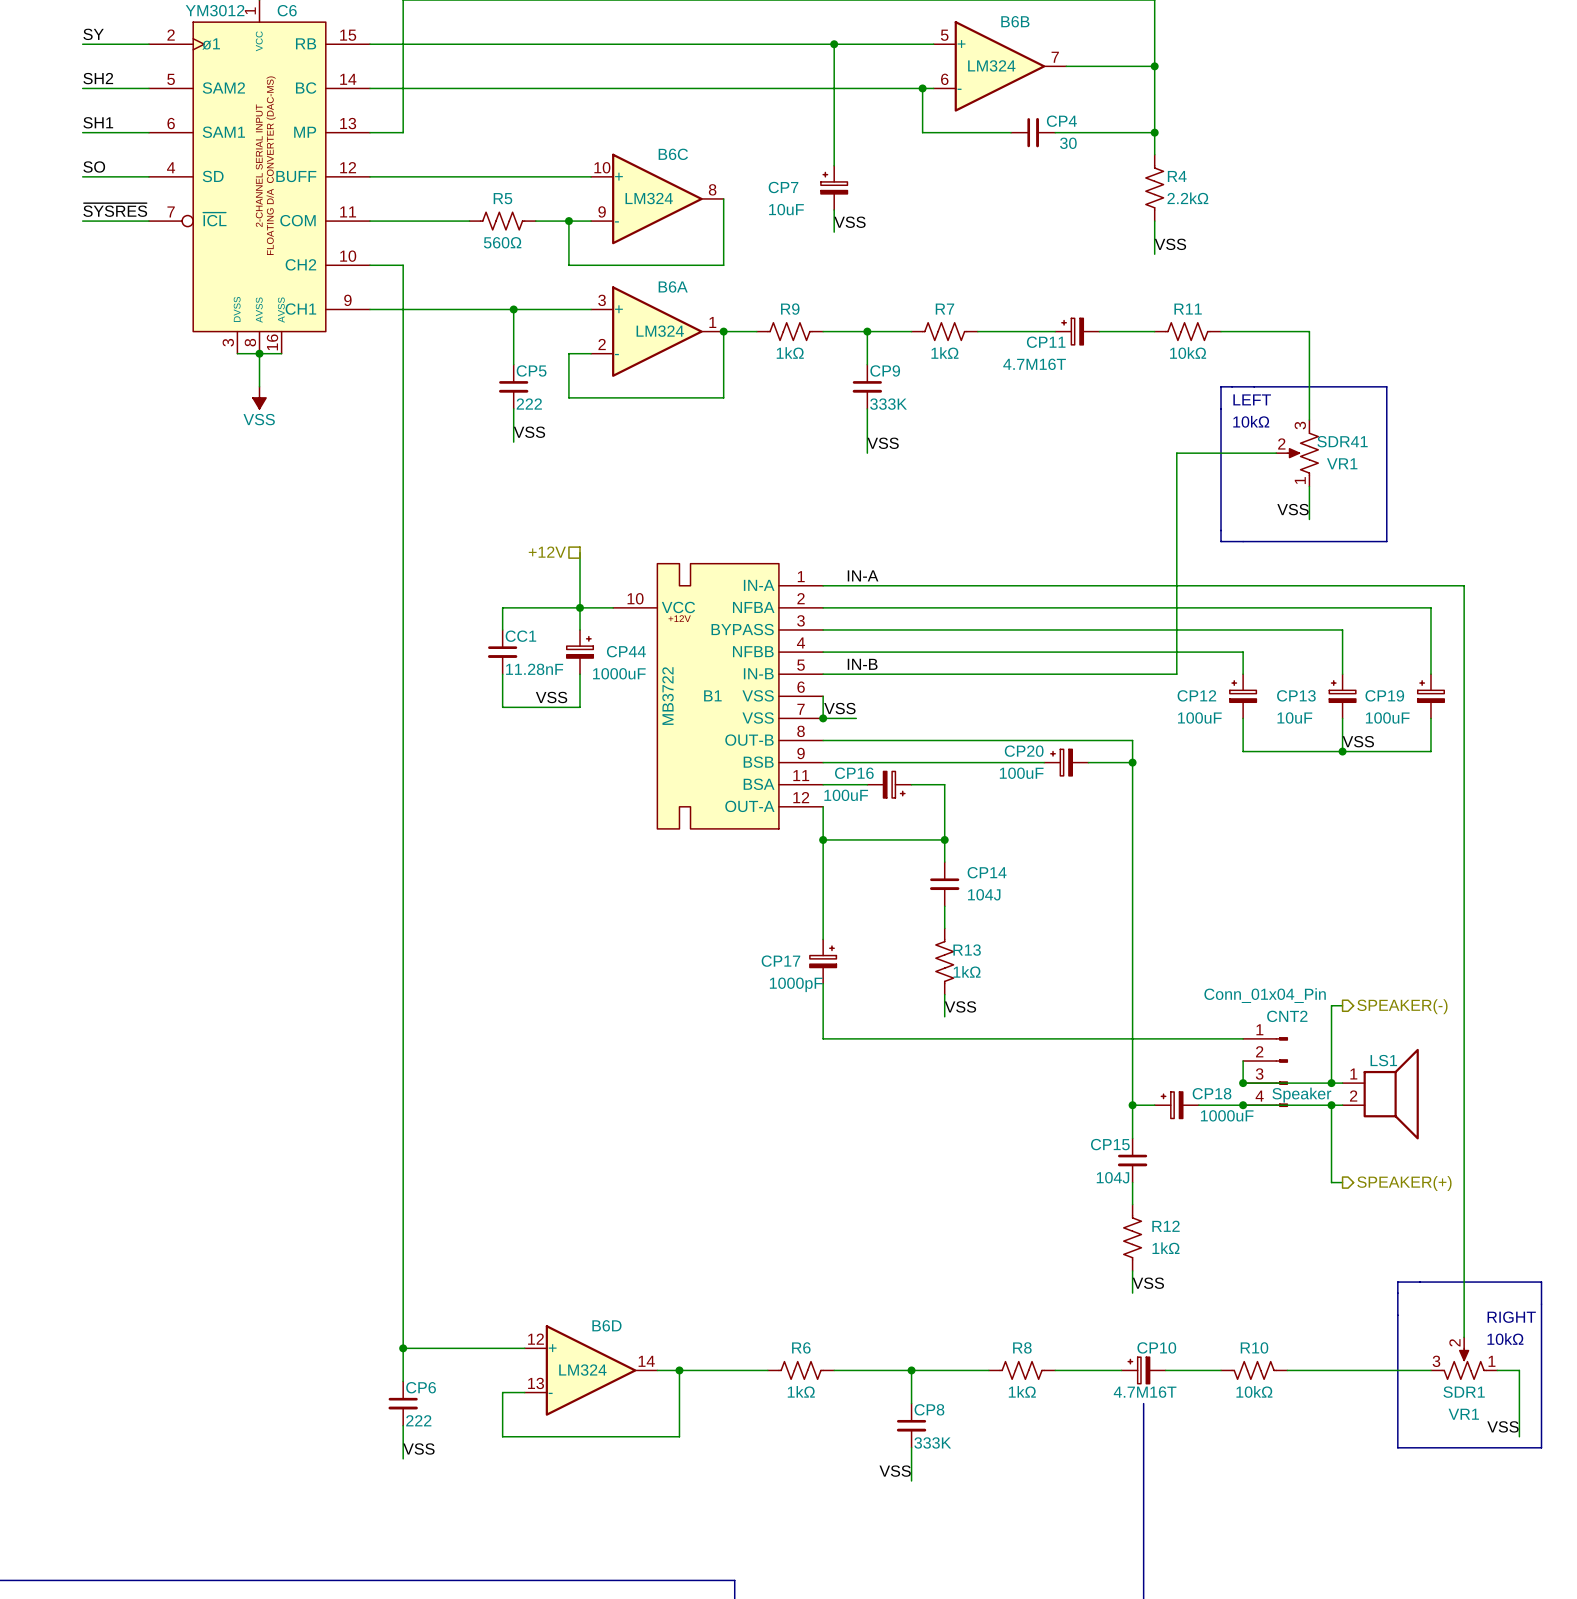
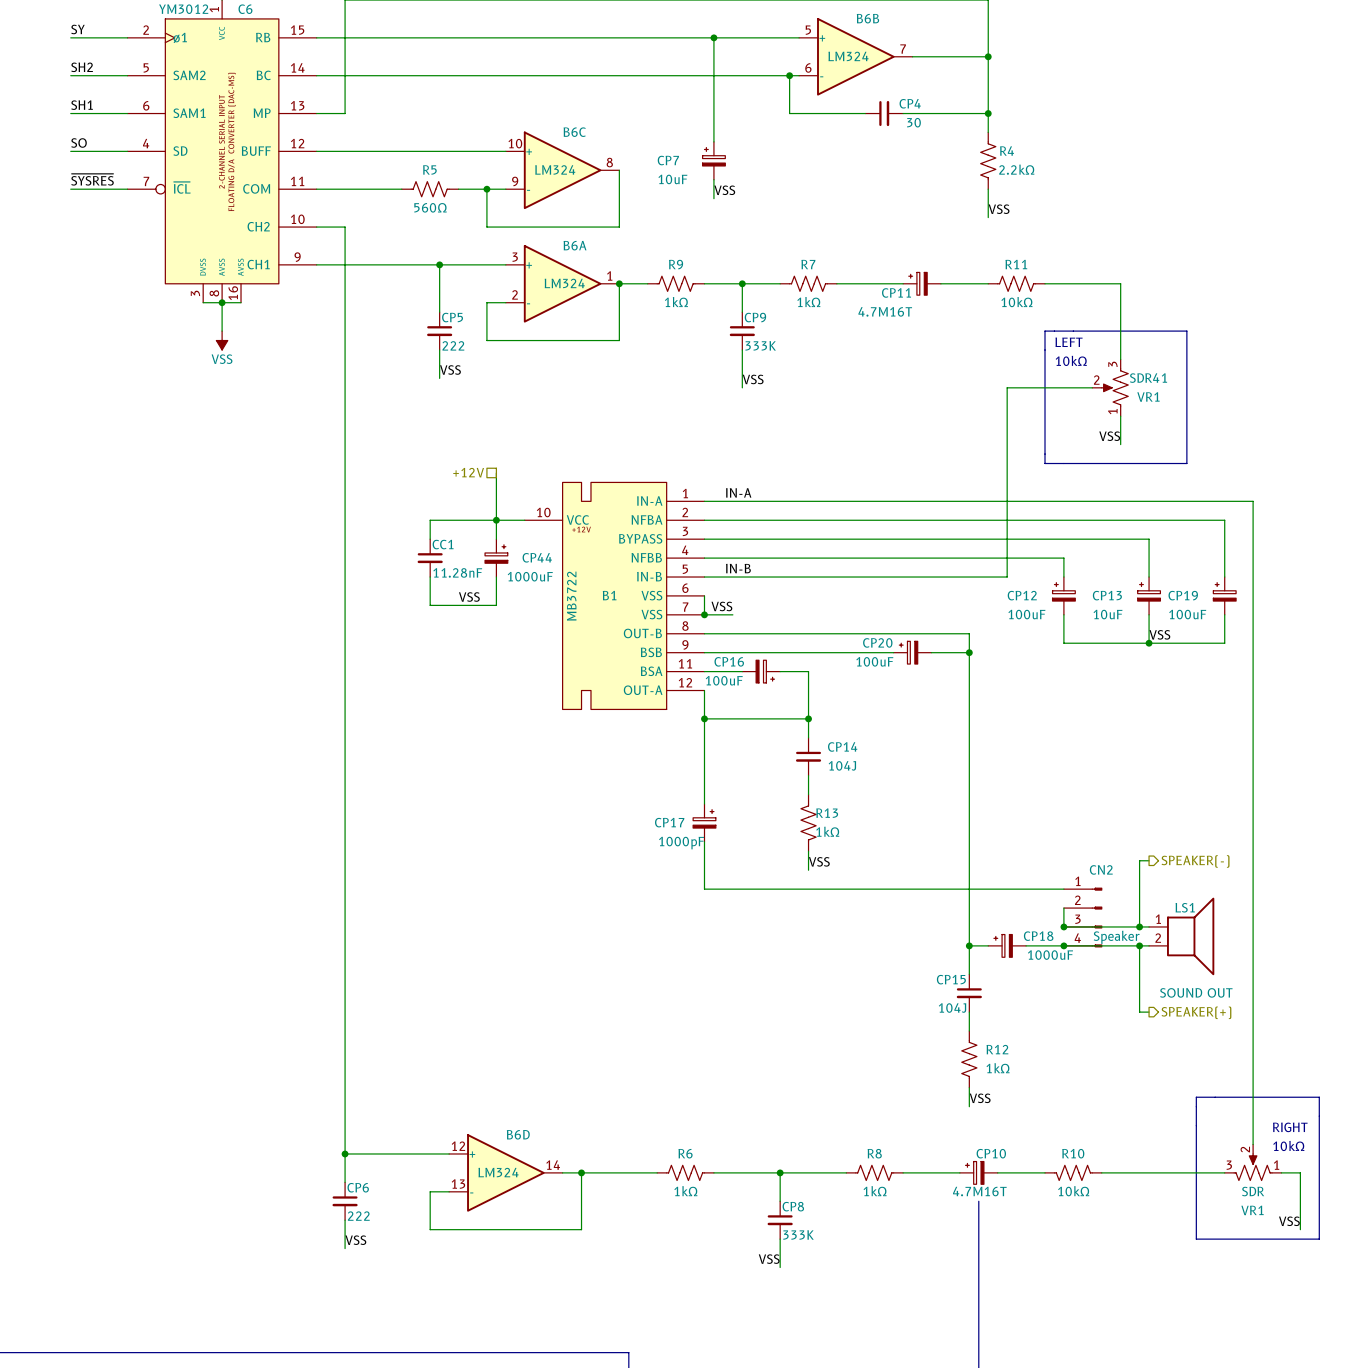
CNT2 value: Conn_01x04_Pin (1265, 995) -> SOUND OUT (1196, 992)
CNT2 name: CNT2 (1287, 1016) -> CN2 (1101, 869)
SDR1 name: SDR1 (1464, 1392) -> SDR (1253, 1191)

